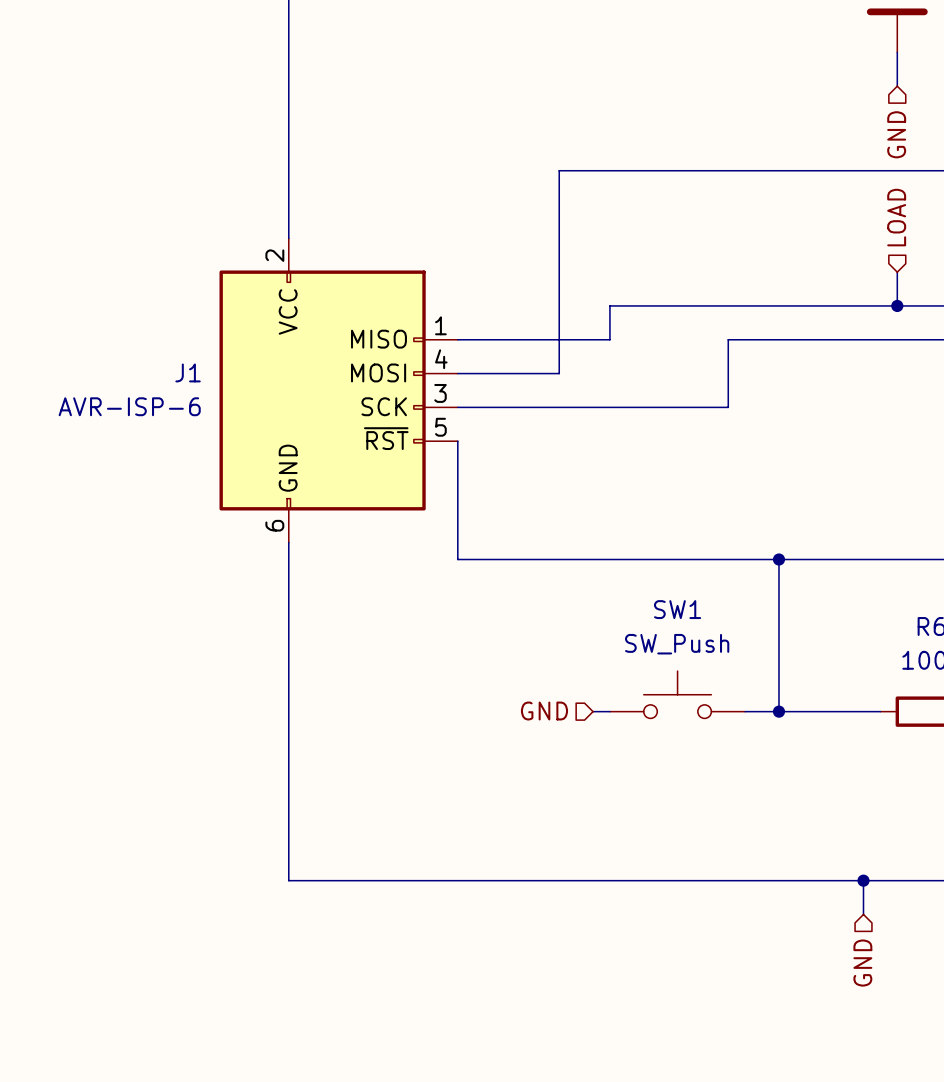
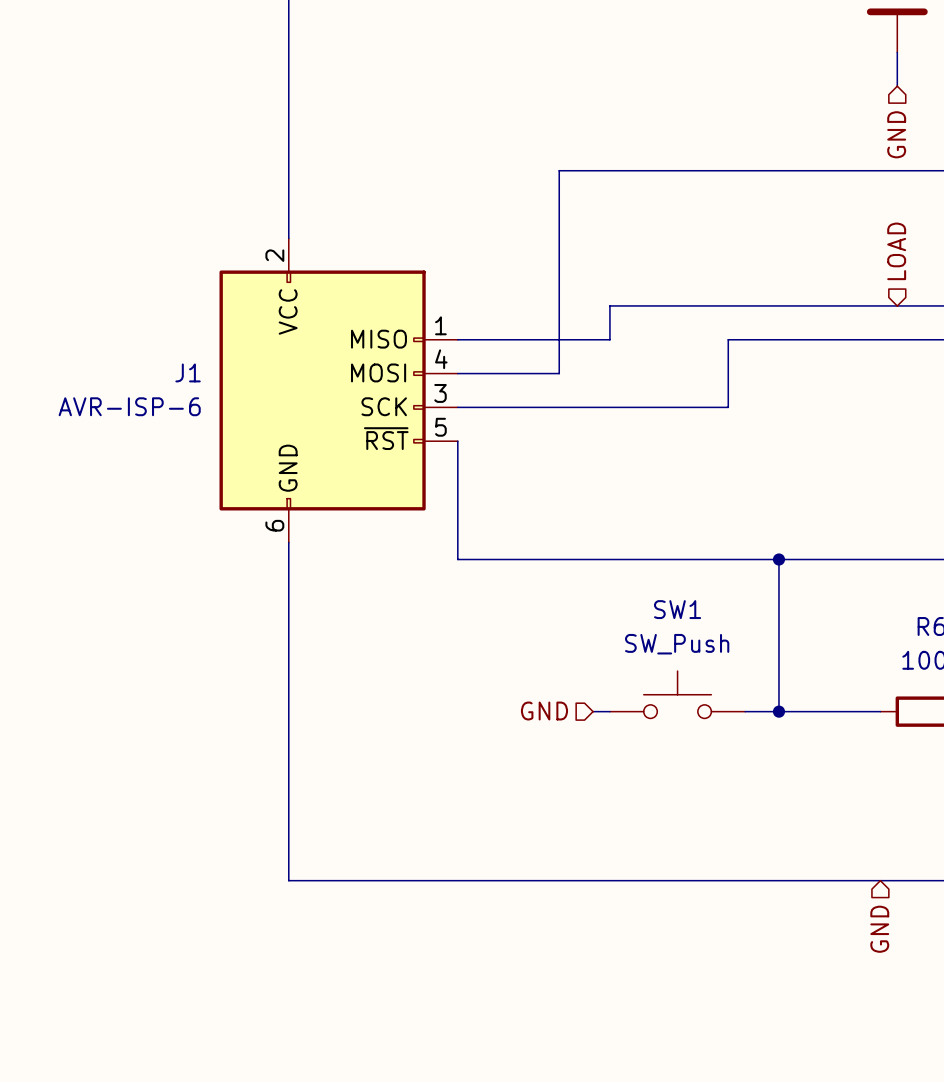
hierarchical label position: LOAD (896, 217) -> LOAD (896, 251)
wire: (897, 272) (897, 305) -> none
junction: (897, 305) -> none
wire: (863, 880) (863, 914) -> none
junction: (863, 880) -> none
hierarchical label position: GND (862, 963) -> GND (879, 929)

